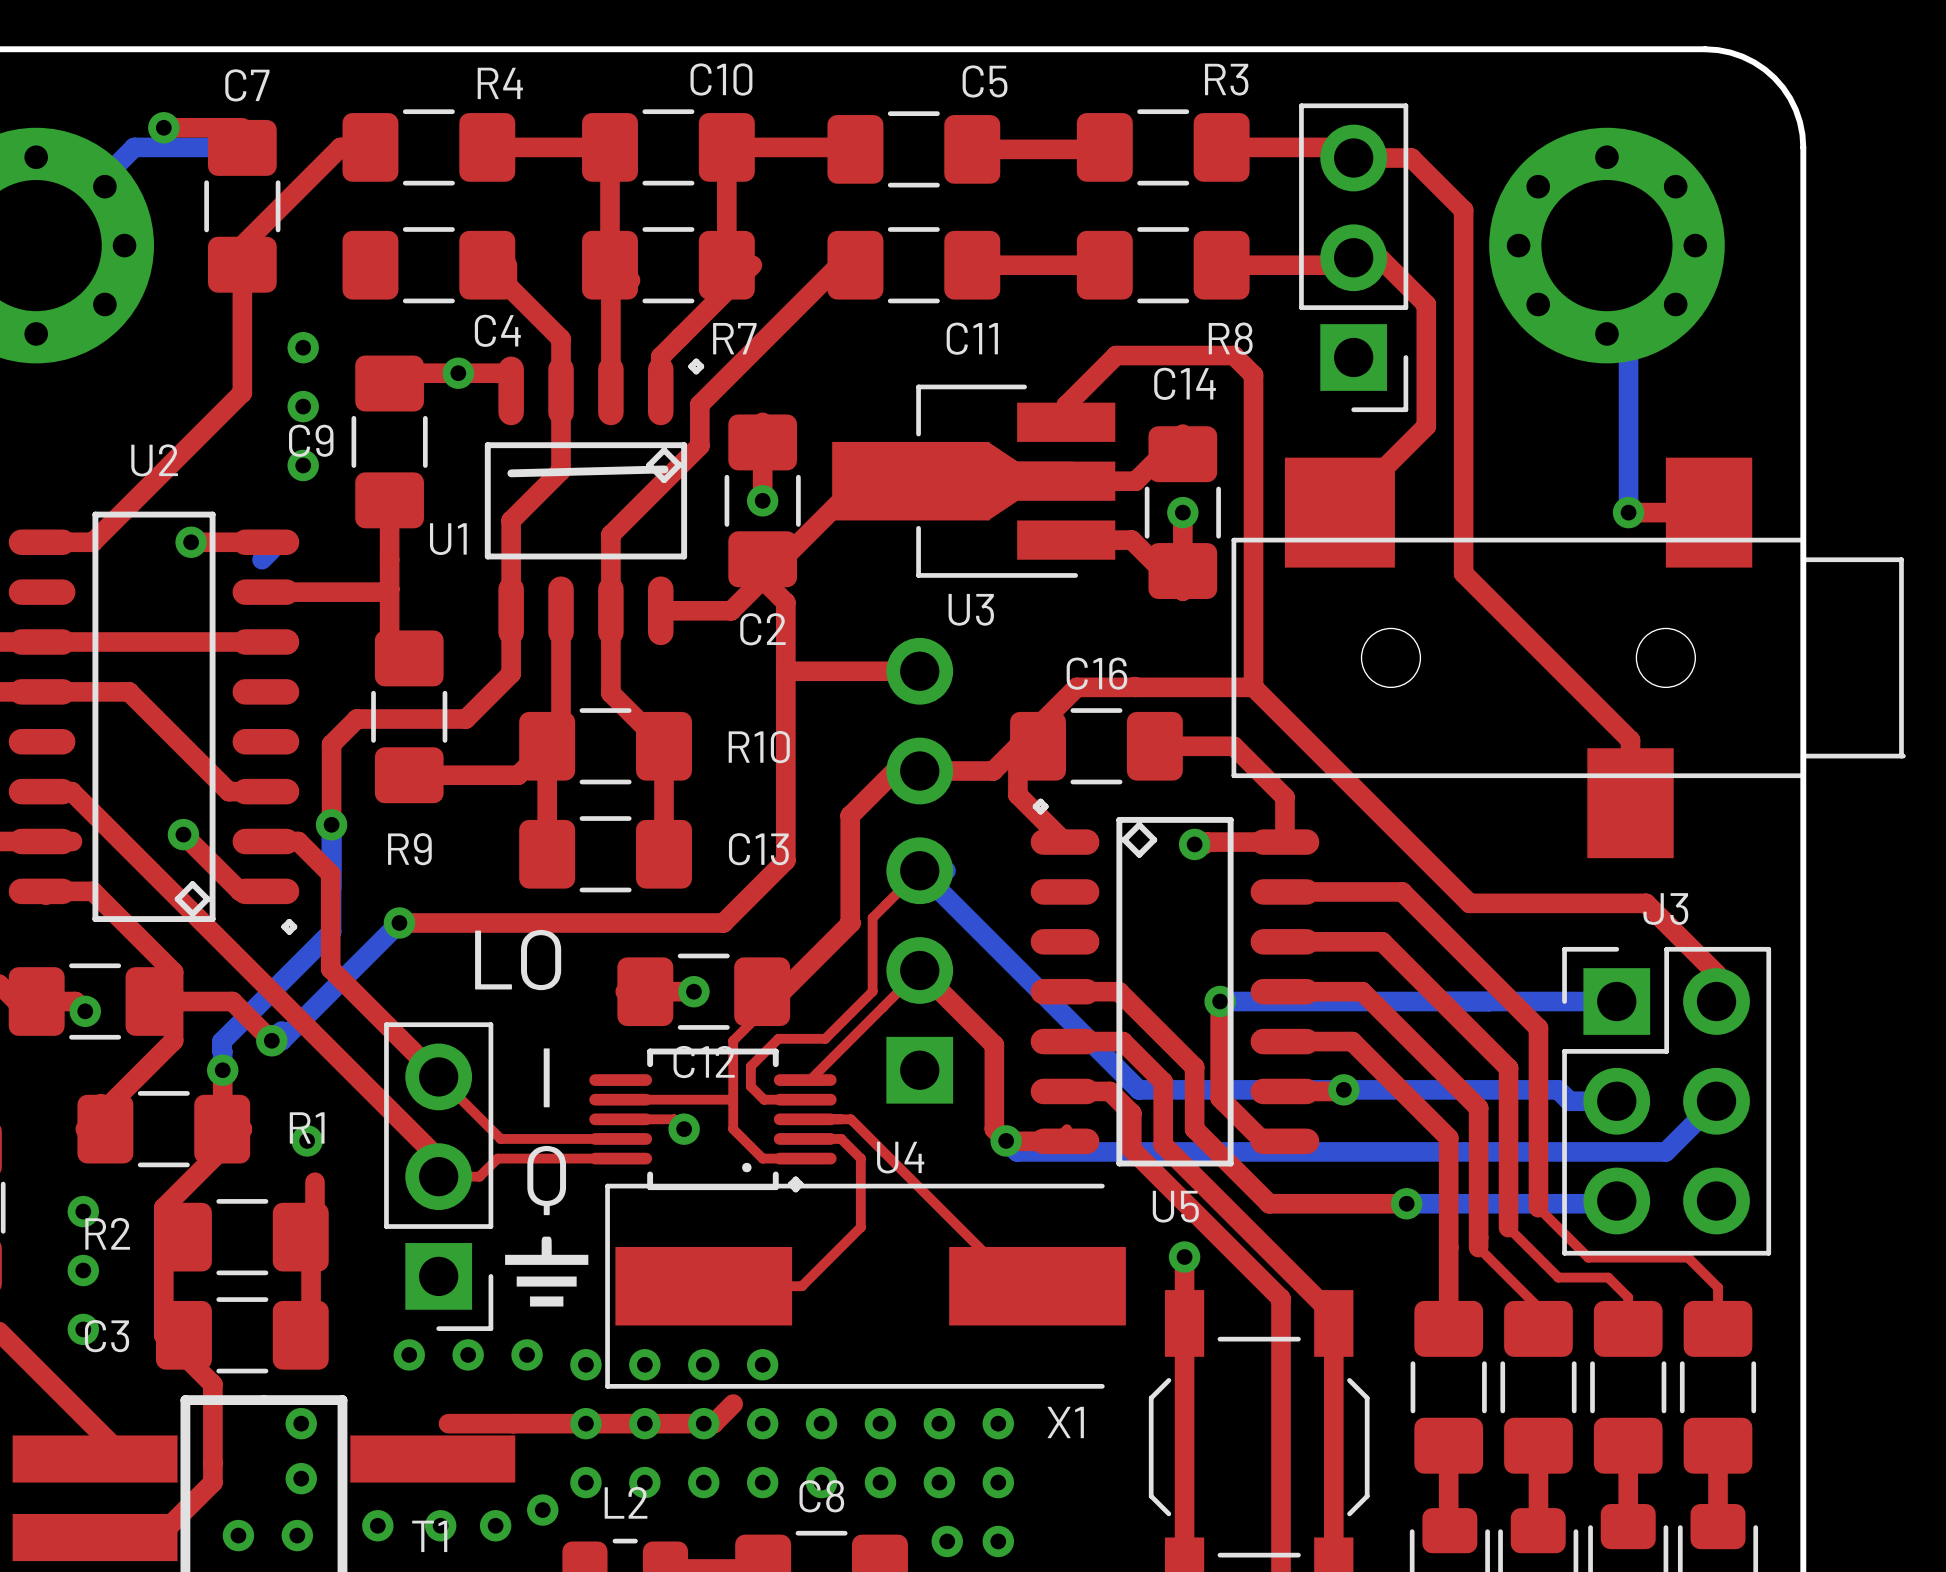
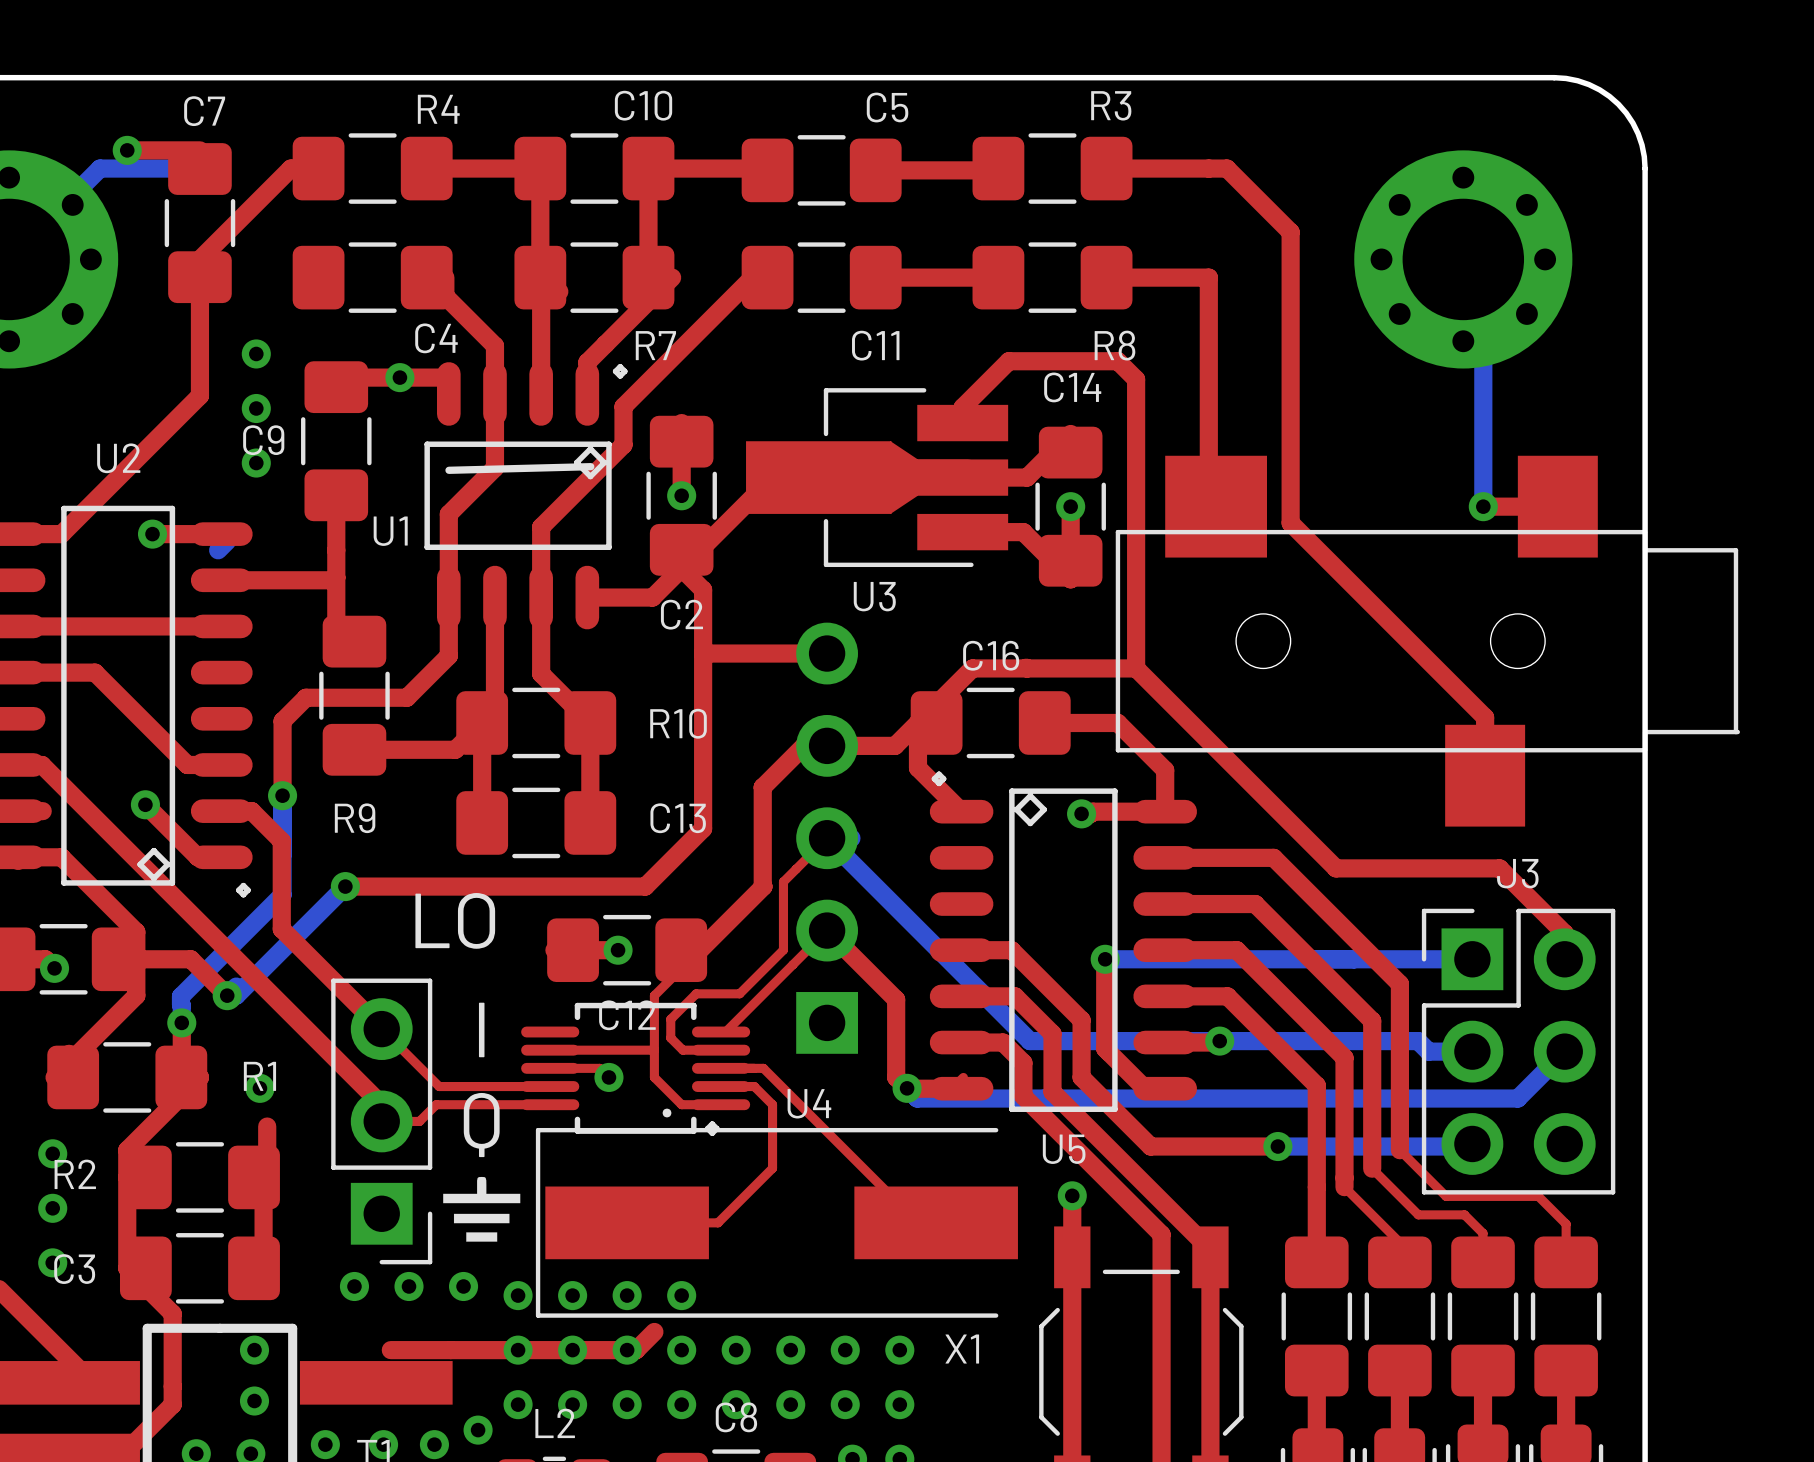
top track: (1343, 147) (1353, 158) (1411, 158) (1463, 210) (1463, 573) -> (1227, 168) (1290, 232) (1290, 523) (1330, 563)
part: (1353, 257) -> none
top track: (1332, 265) (1346, 265) (1353, 257) (1379, 257) (1426, 304) (1426, 426) (1339, 512) -> (1208, 277) (1208, 499)

